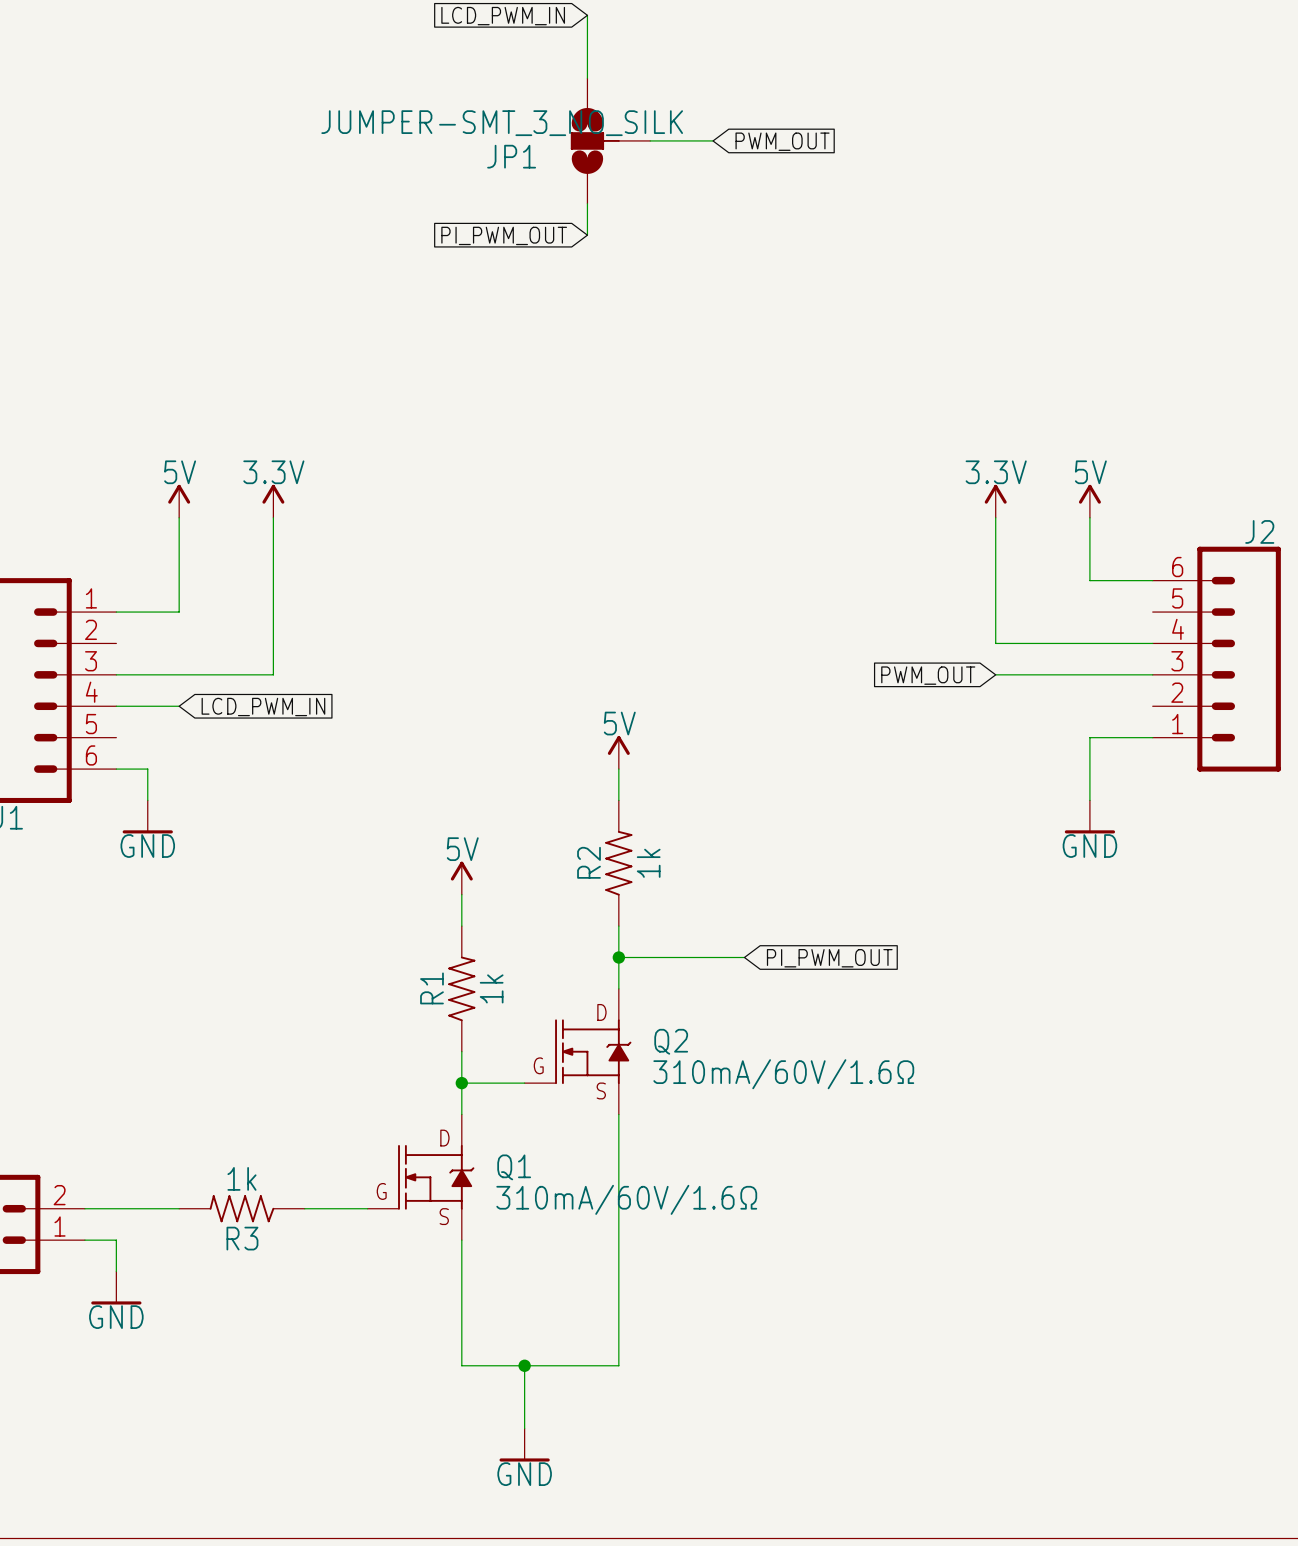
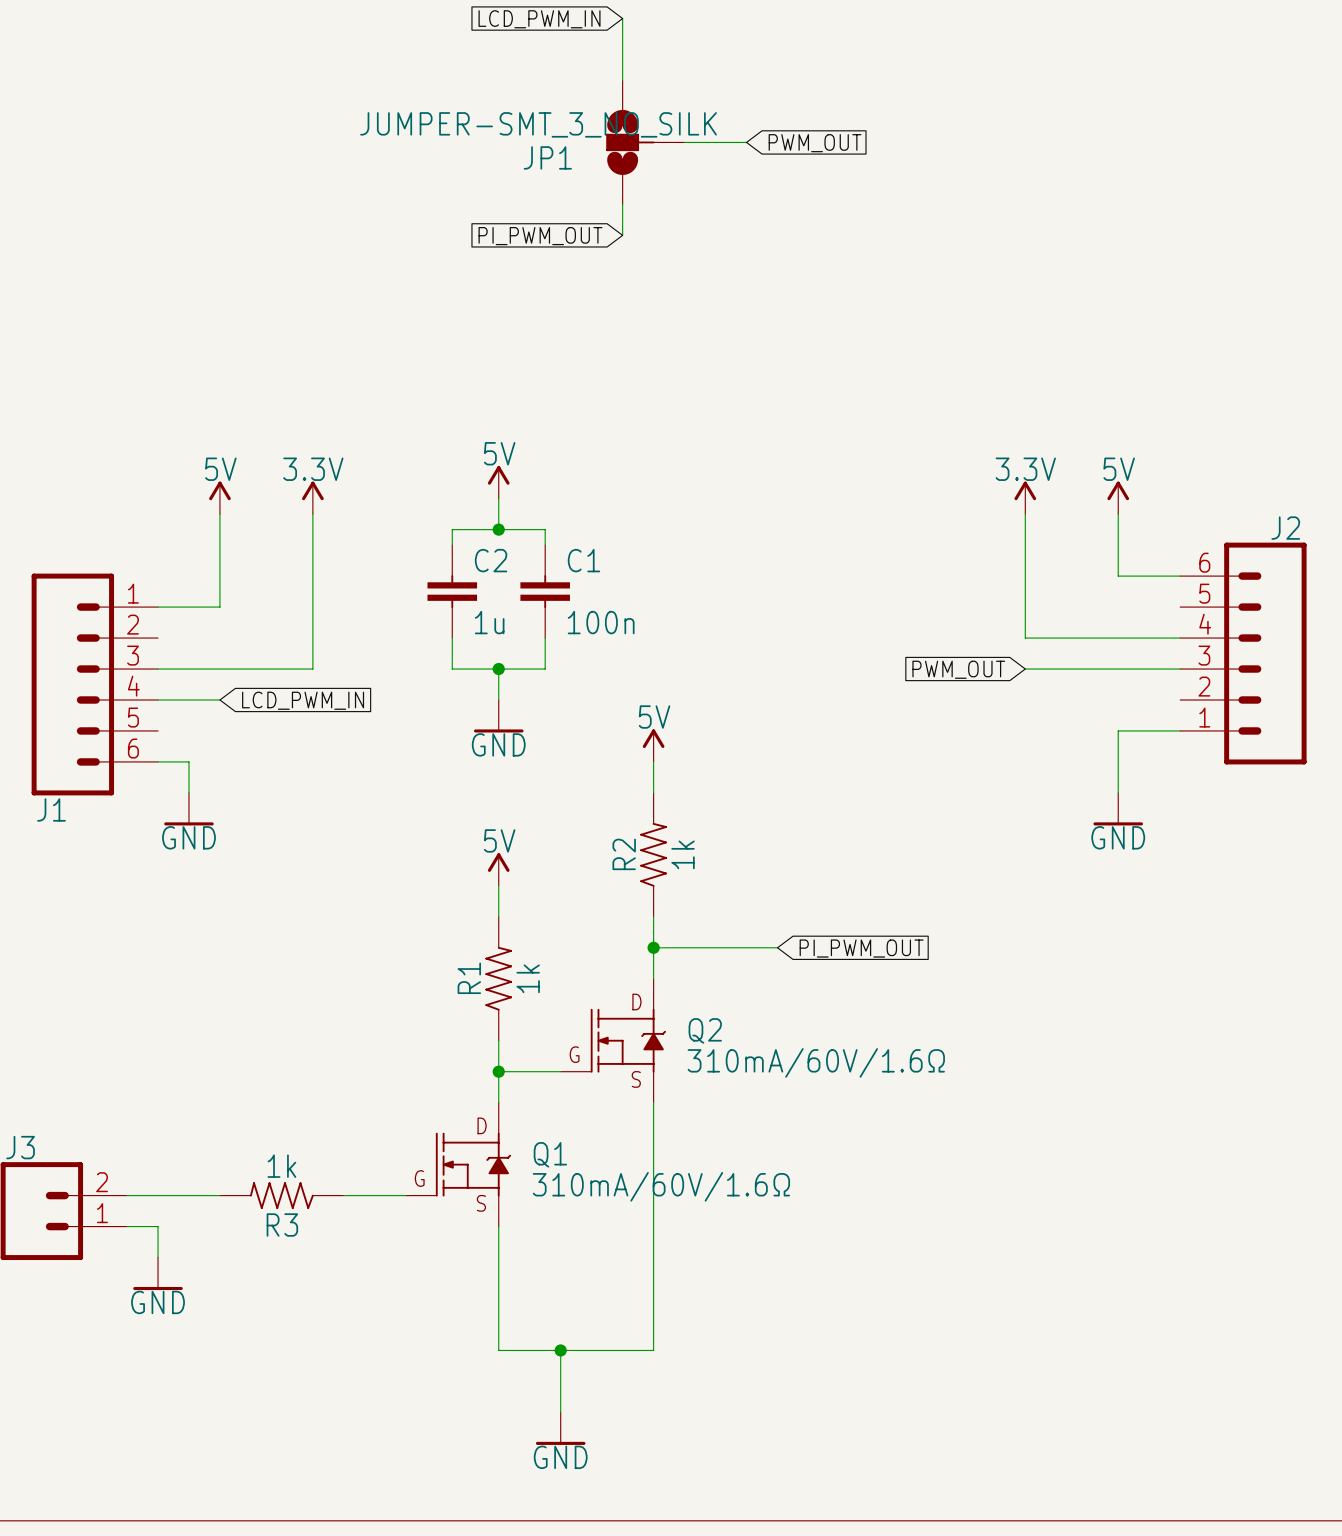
power symbol: none -> 5V (498, 482)
wire: none -> (498, 498) (498, 529)
junction: none -> (498, 529)
wire: none -> (452, 545) (452, 529) (545, 529) (545, 545)
C2: none -> 1u (452, 591)
C1: none -> 100n (545, 591)
wire: none -> (452, 638) (452, 669) (545, 669) (545, 638)
wire: none -> (498, 669) (498, 699)
junction: none -> (498, 669)
power symbol: none -> GND (498, 716)

